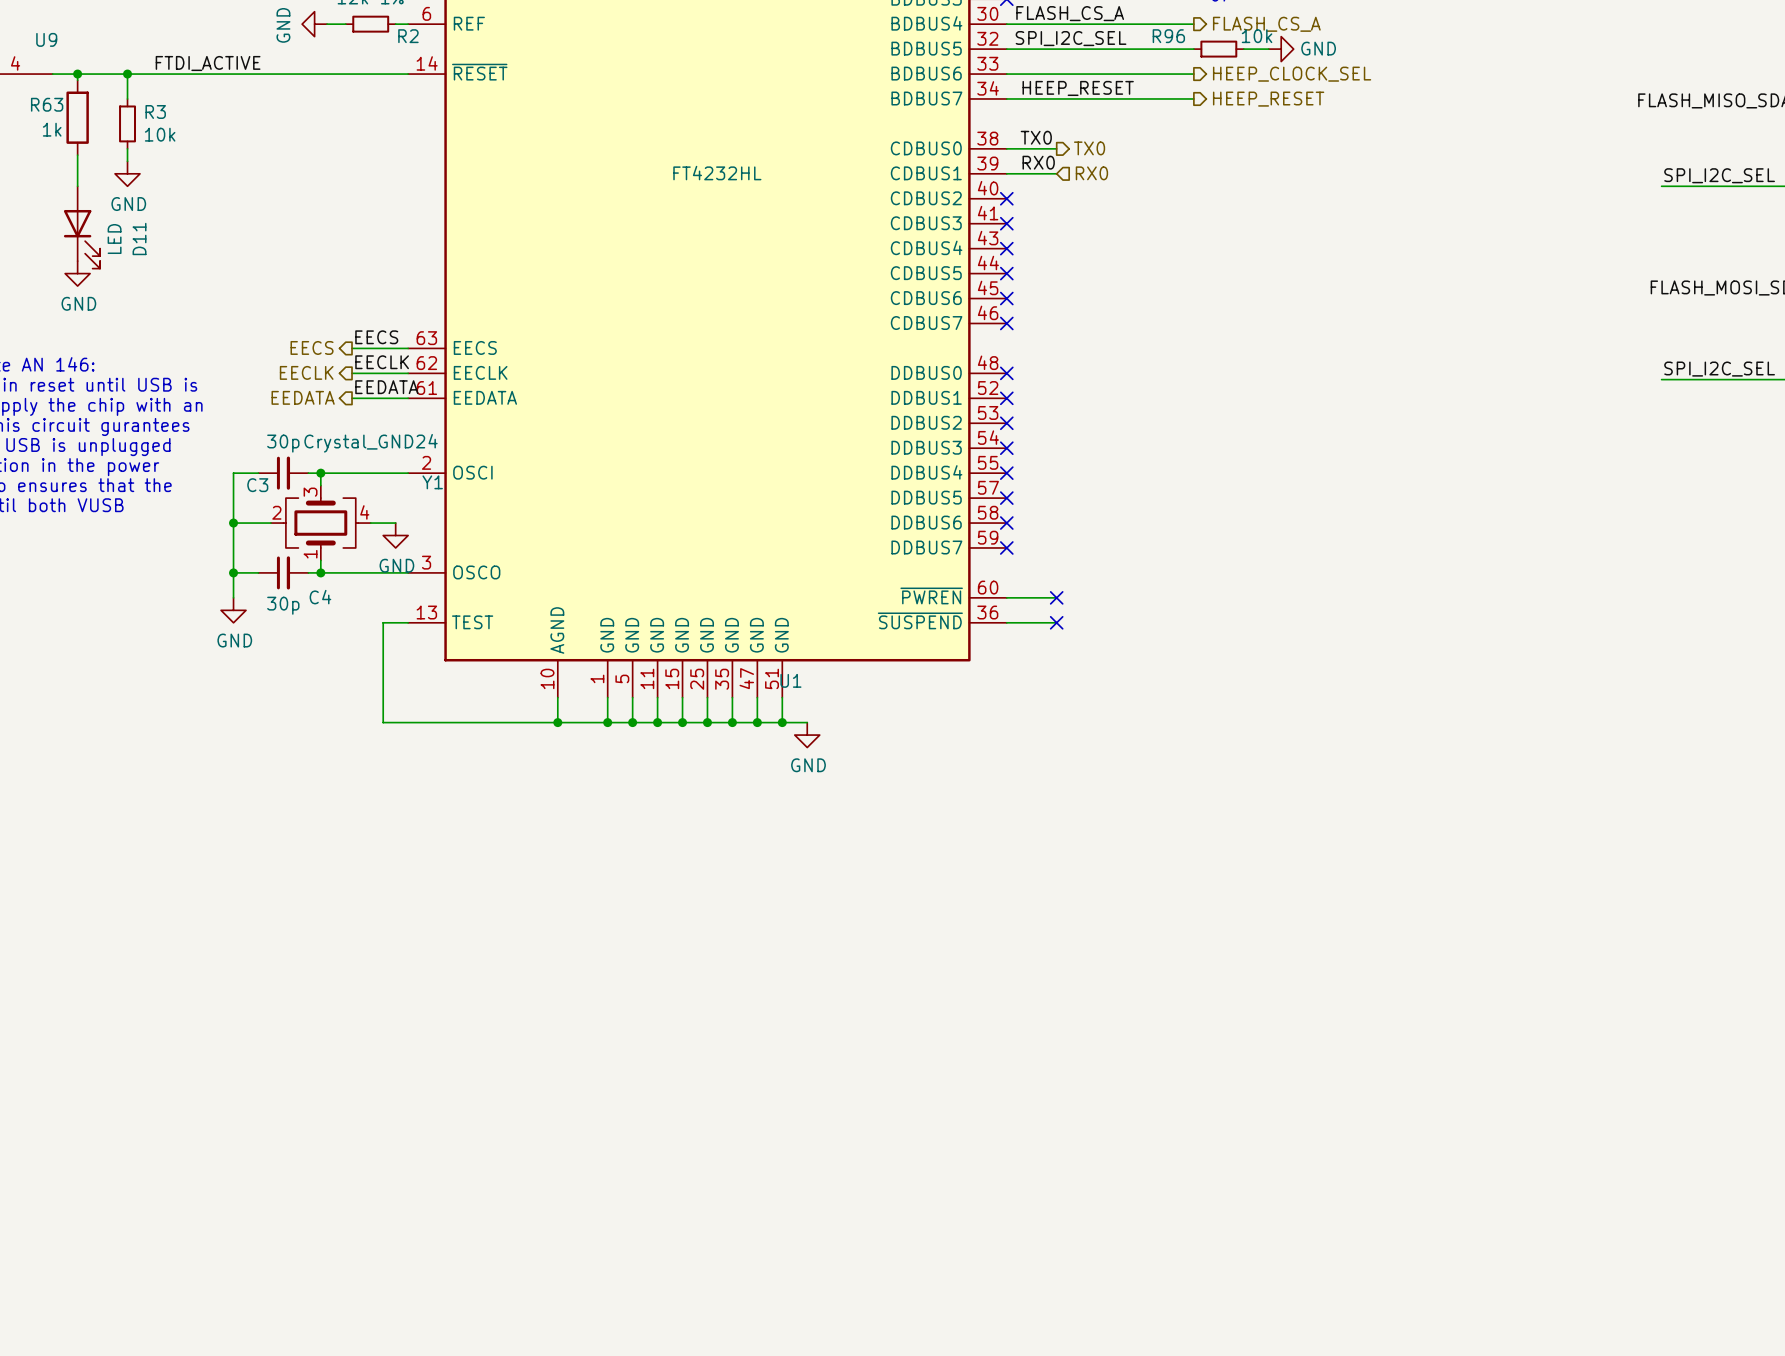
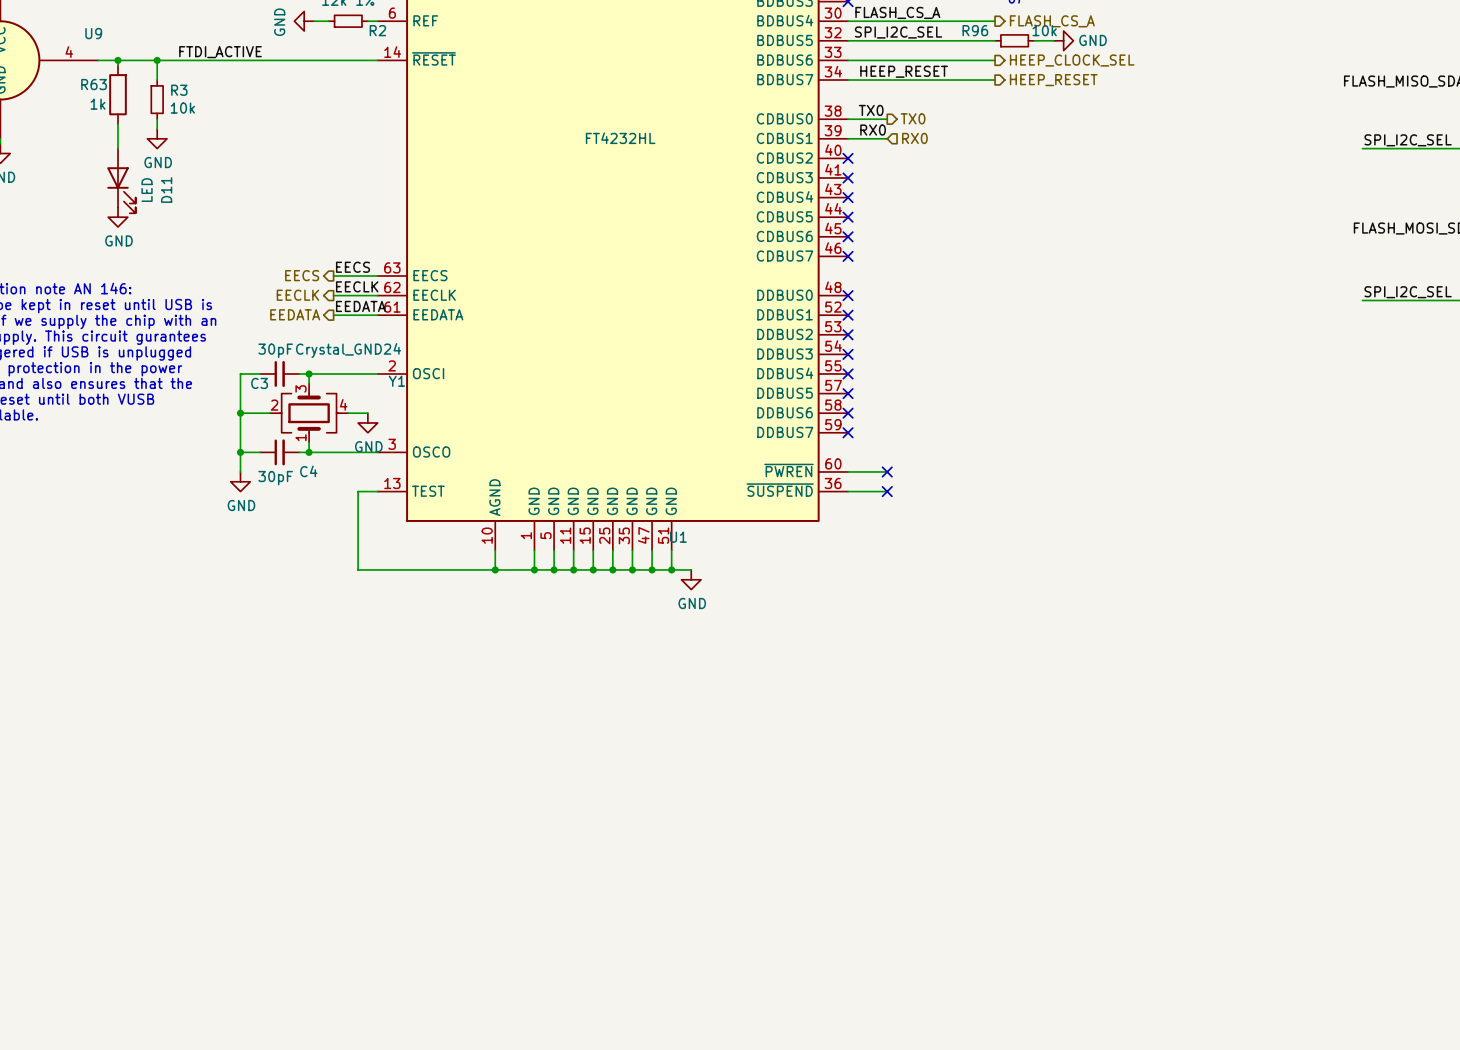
C3 value: 30p (283, 443) -> 30pF (275, 350)
C4 value: 30p (283, 605) -> 30pF (275, 478)

